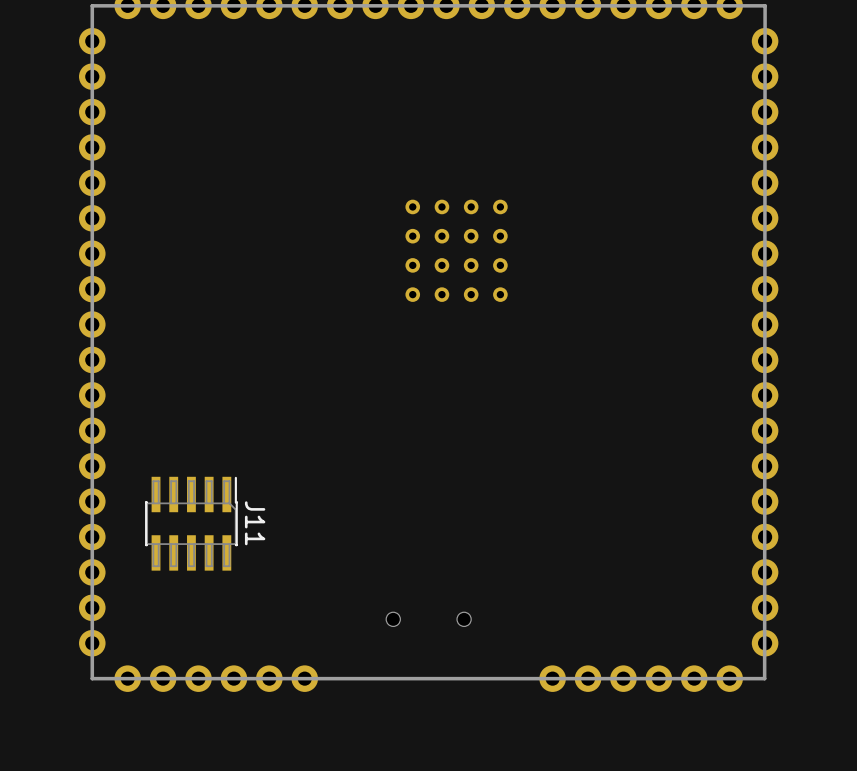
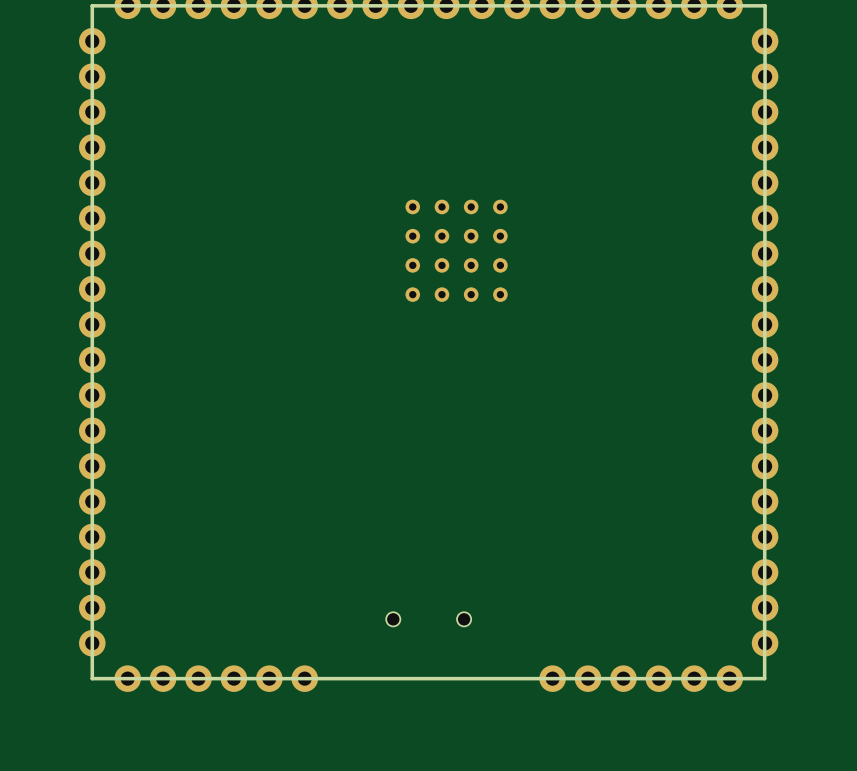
J11: (191, 523) -> none

